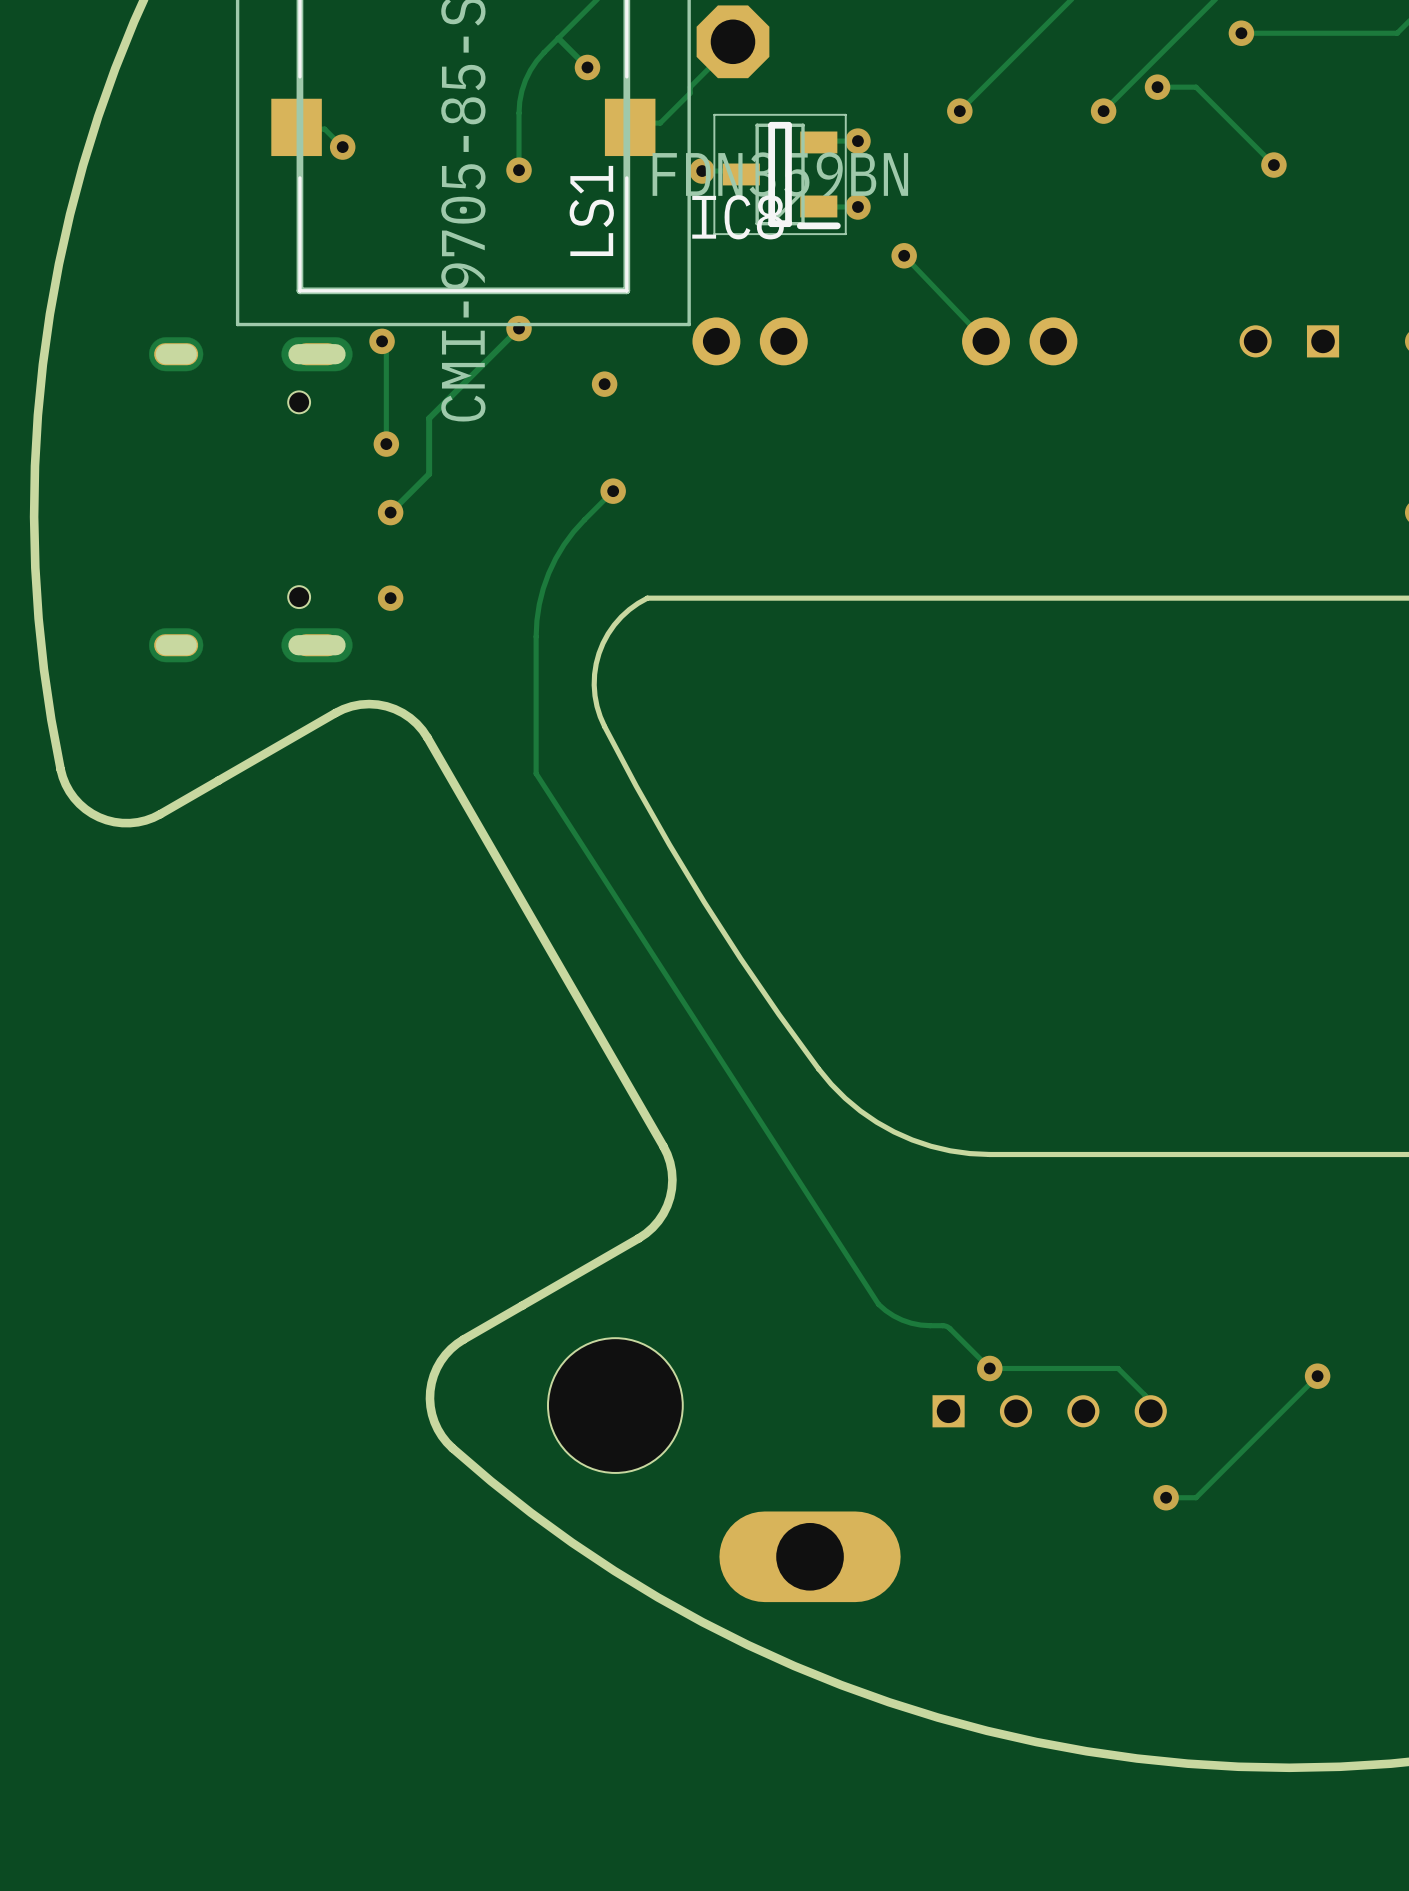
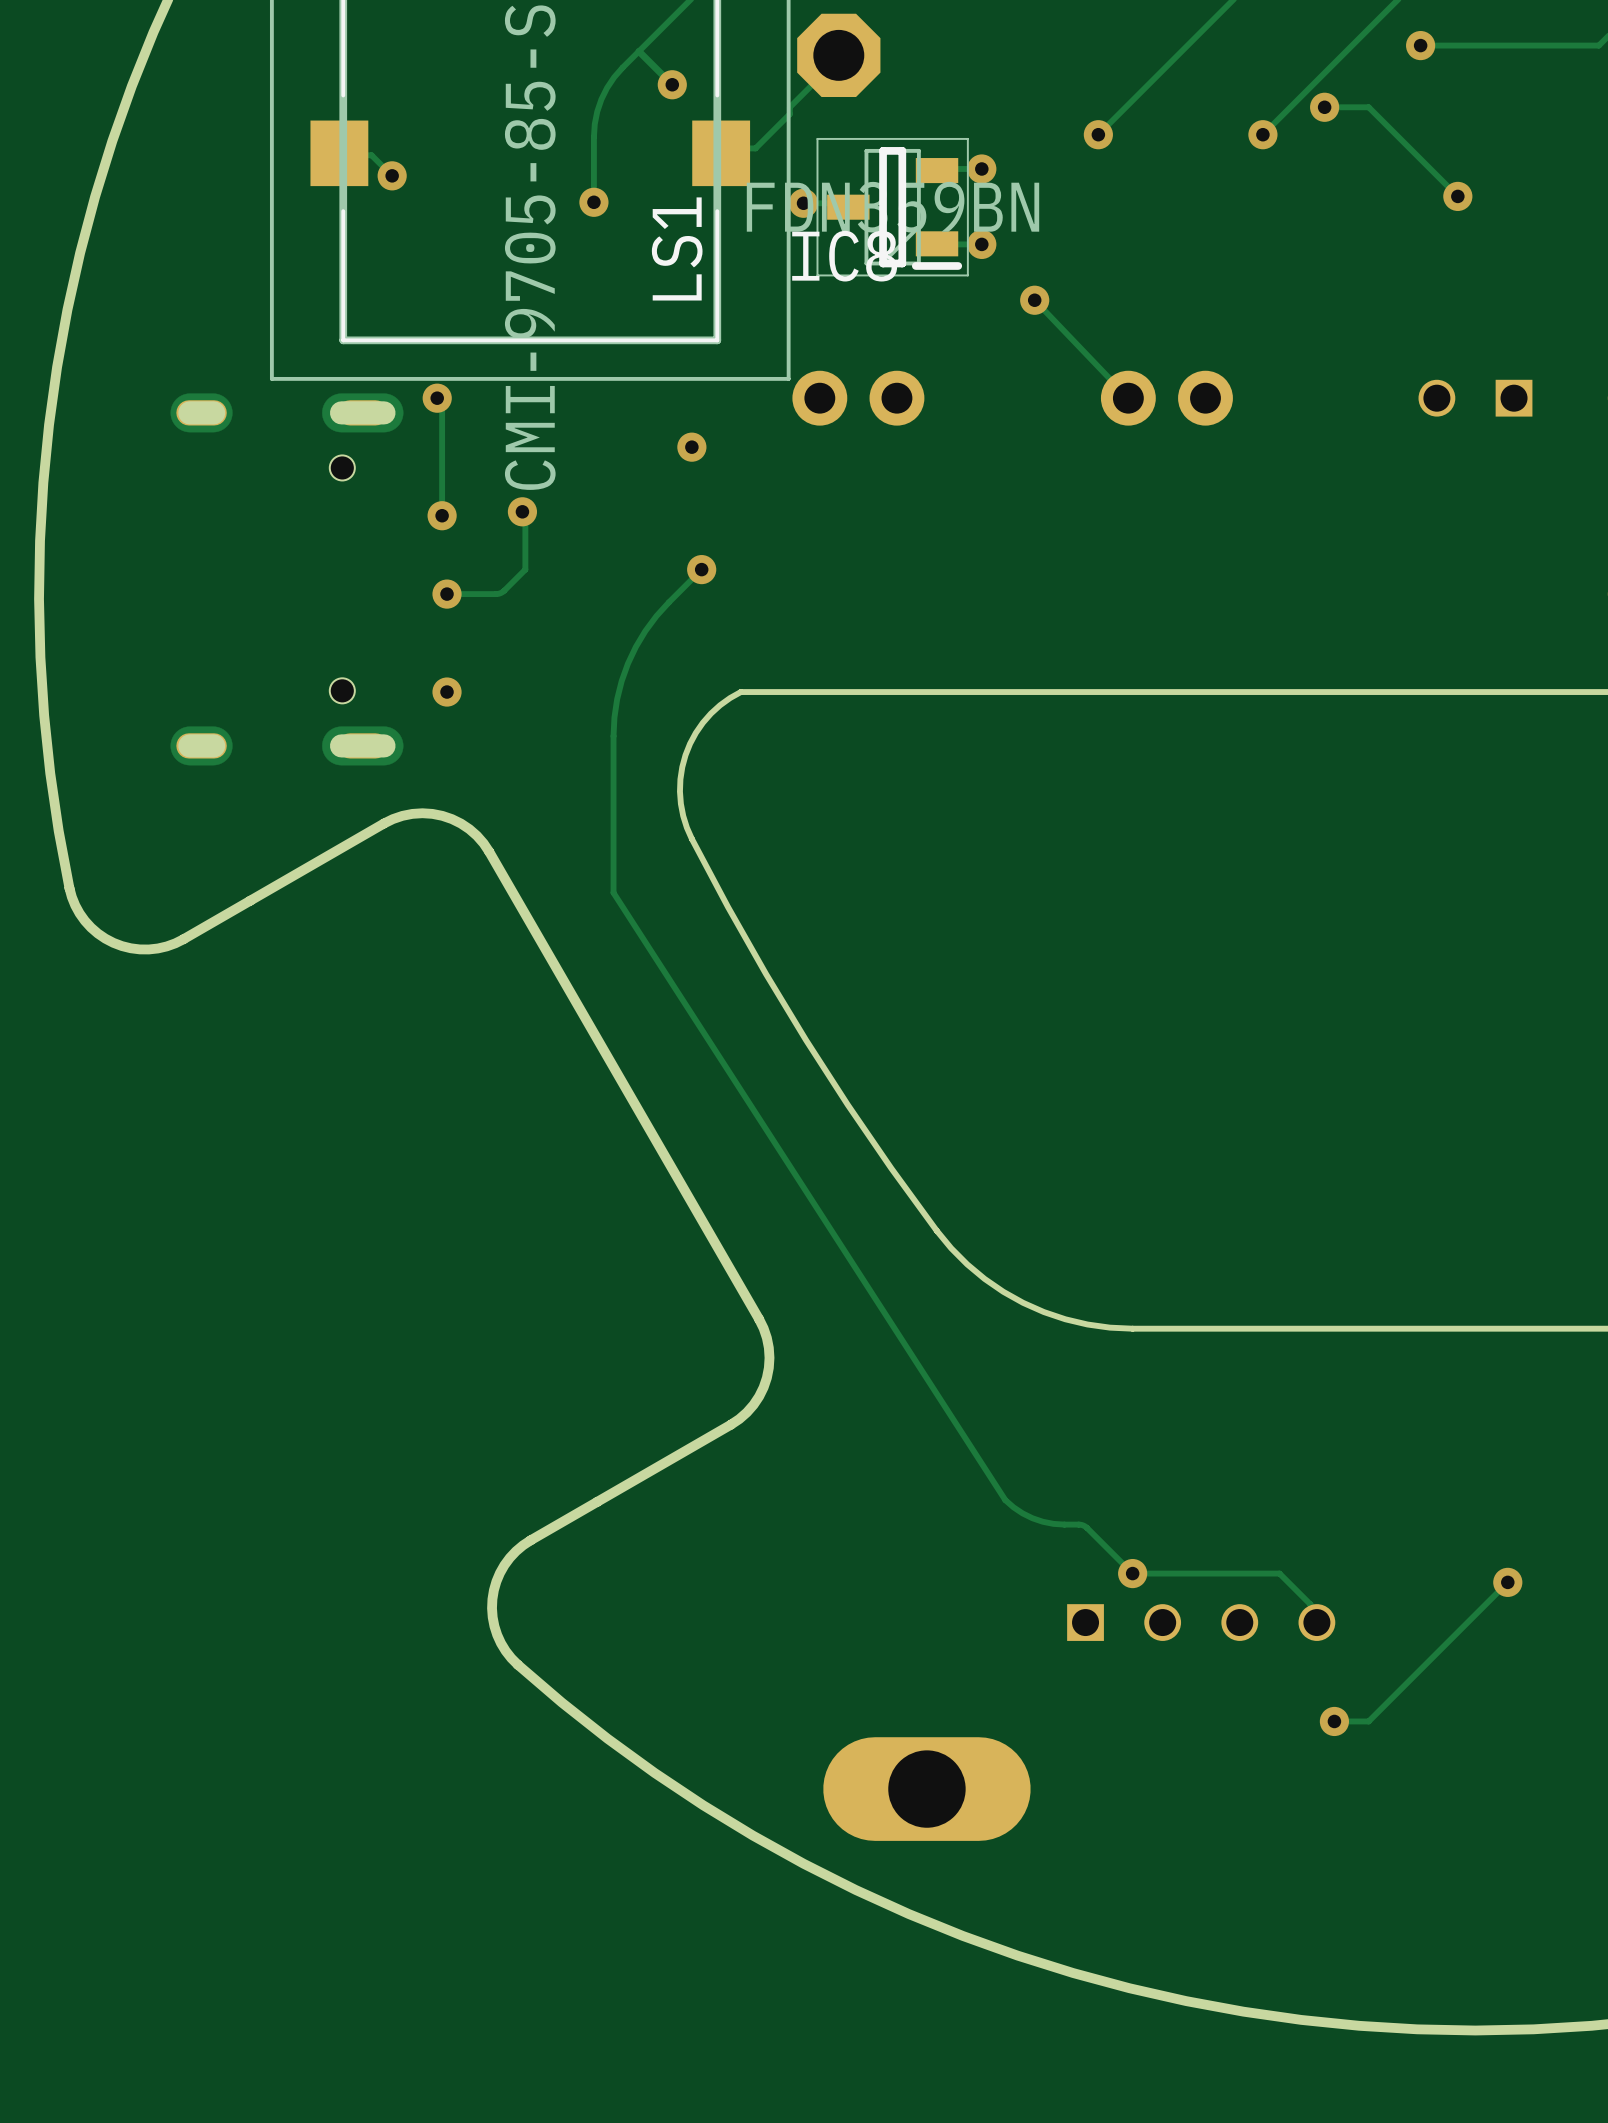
track: (519, 328) (429, 418) (429, 474) (390, 512) -> (522, 511) (525, 518) (525, 569) (499, 593) (447, 594)
via position: (519, 328) -> (522, 511)
hole: (615, 1405) -> none

